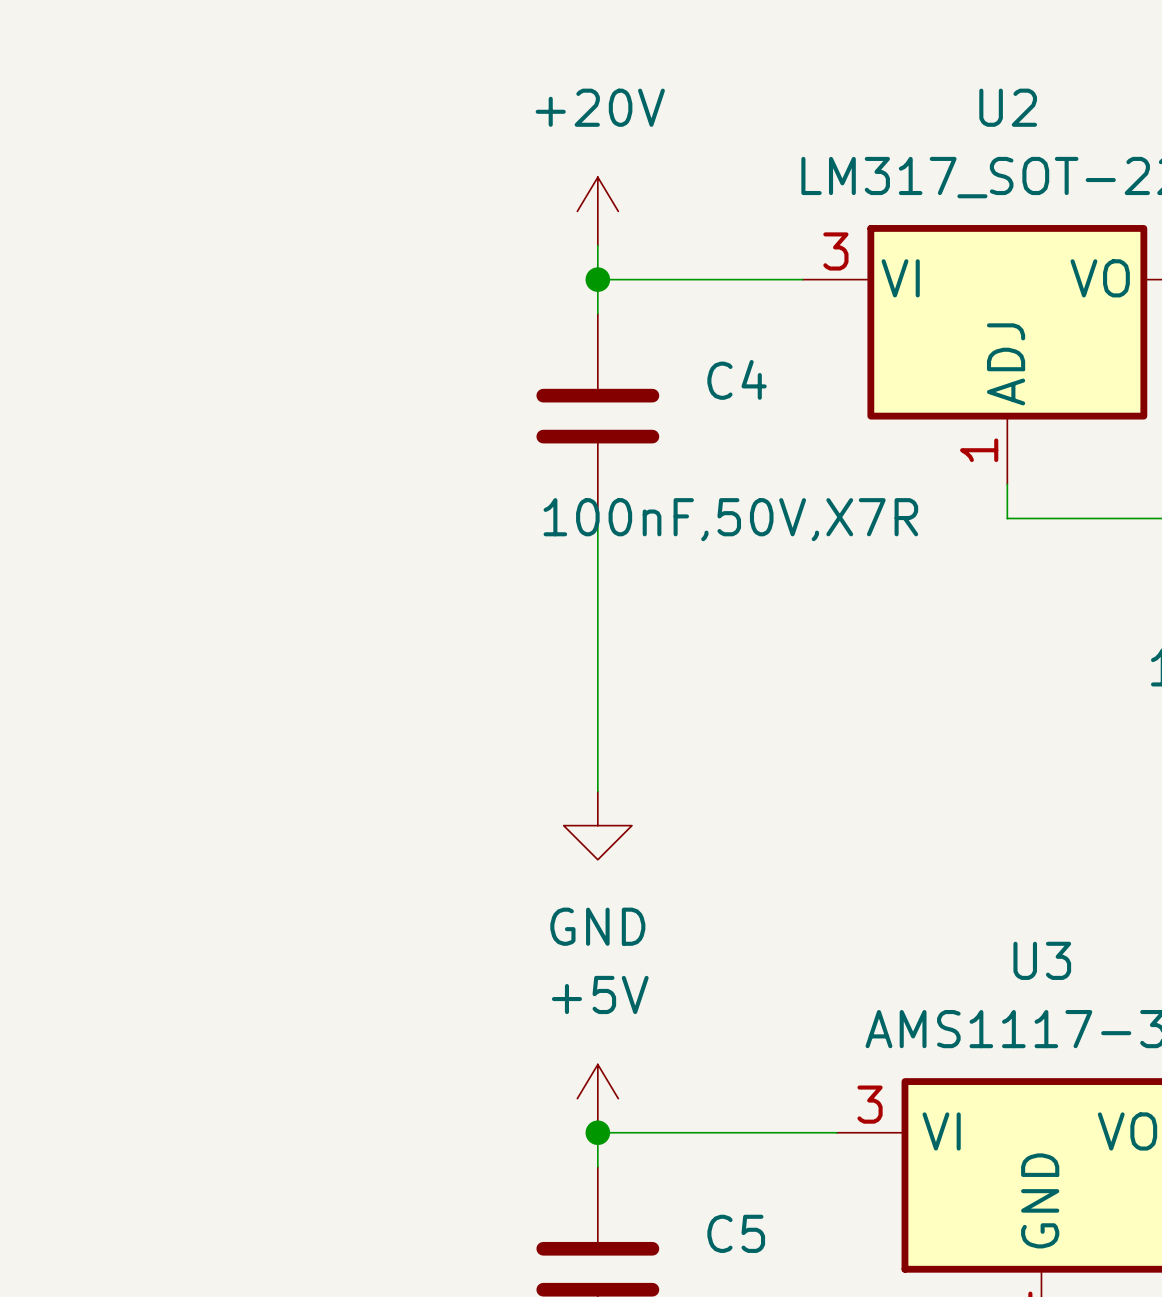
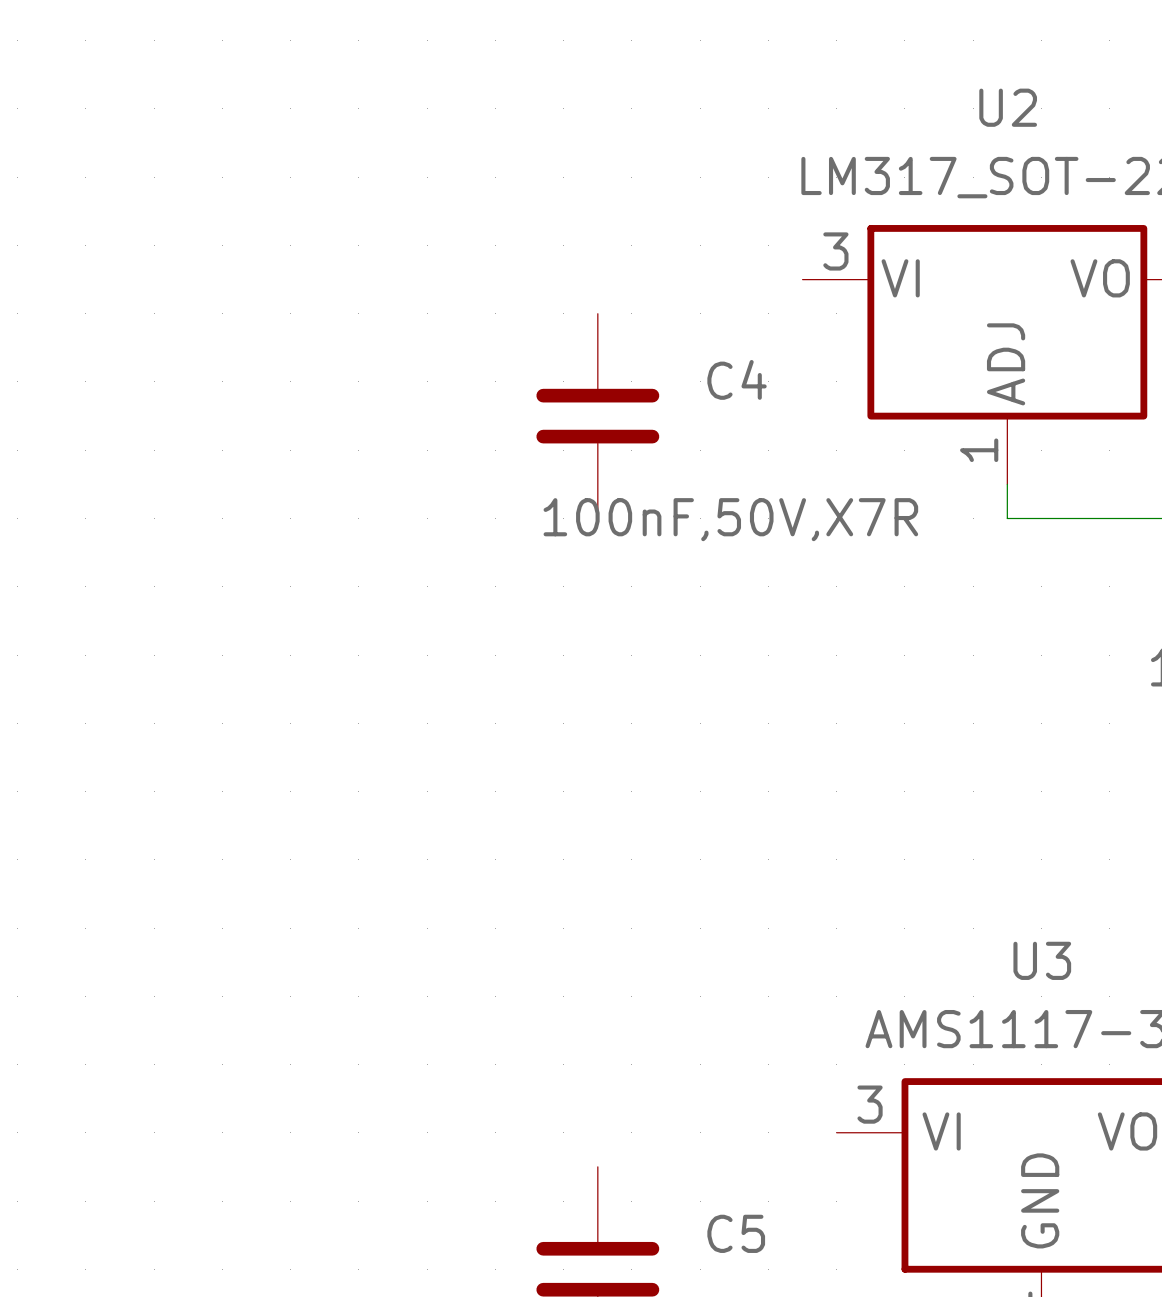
power symbol: +20V (597, 211) -> none
wire: (597, 245) (597, 313) -> none
wire: (597, 279) (802, 279) -> none
junction: (597, 279) -> none
wire: (597, 518) (597, 791) -> none
power symbol: GND (597, 825) -> none
power symbol: +5V (597, 1098) -> none
junction: (597, 1132) -> none
wire: (836, 1132) (597, 1132) (597, 1166) -> none

